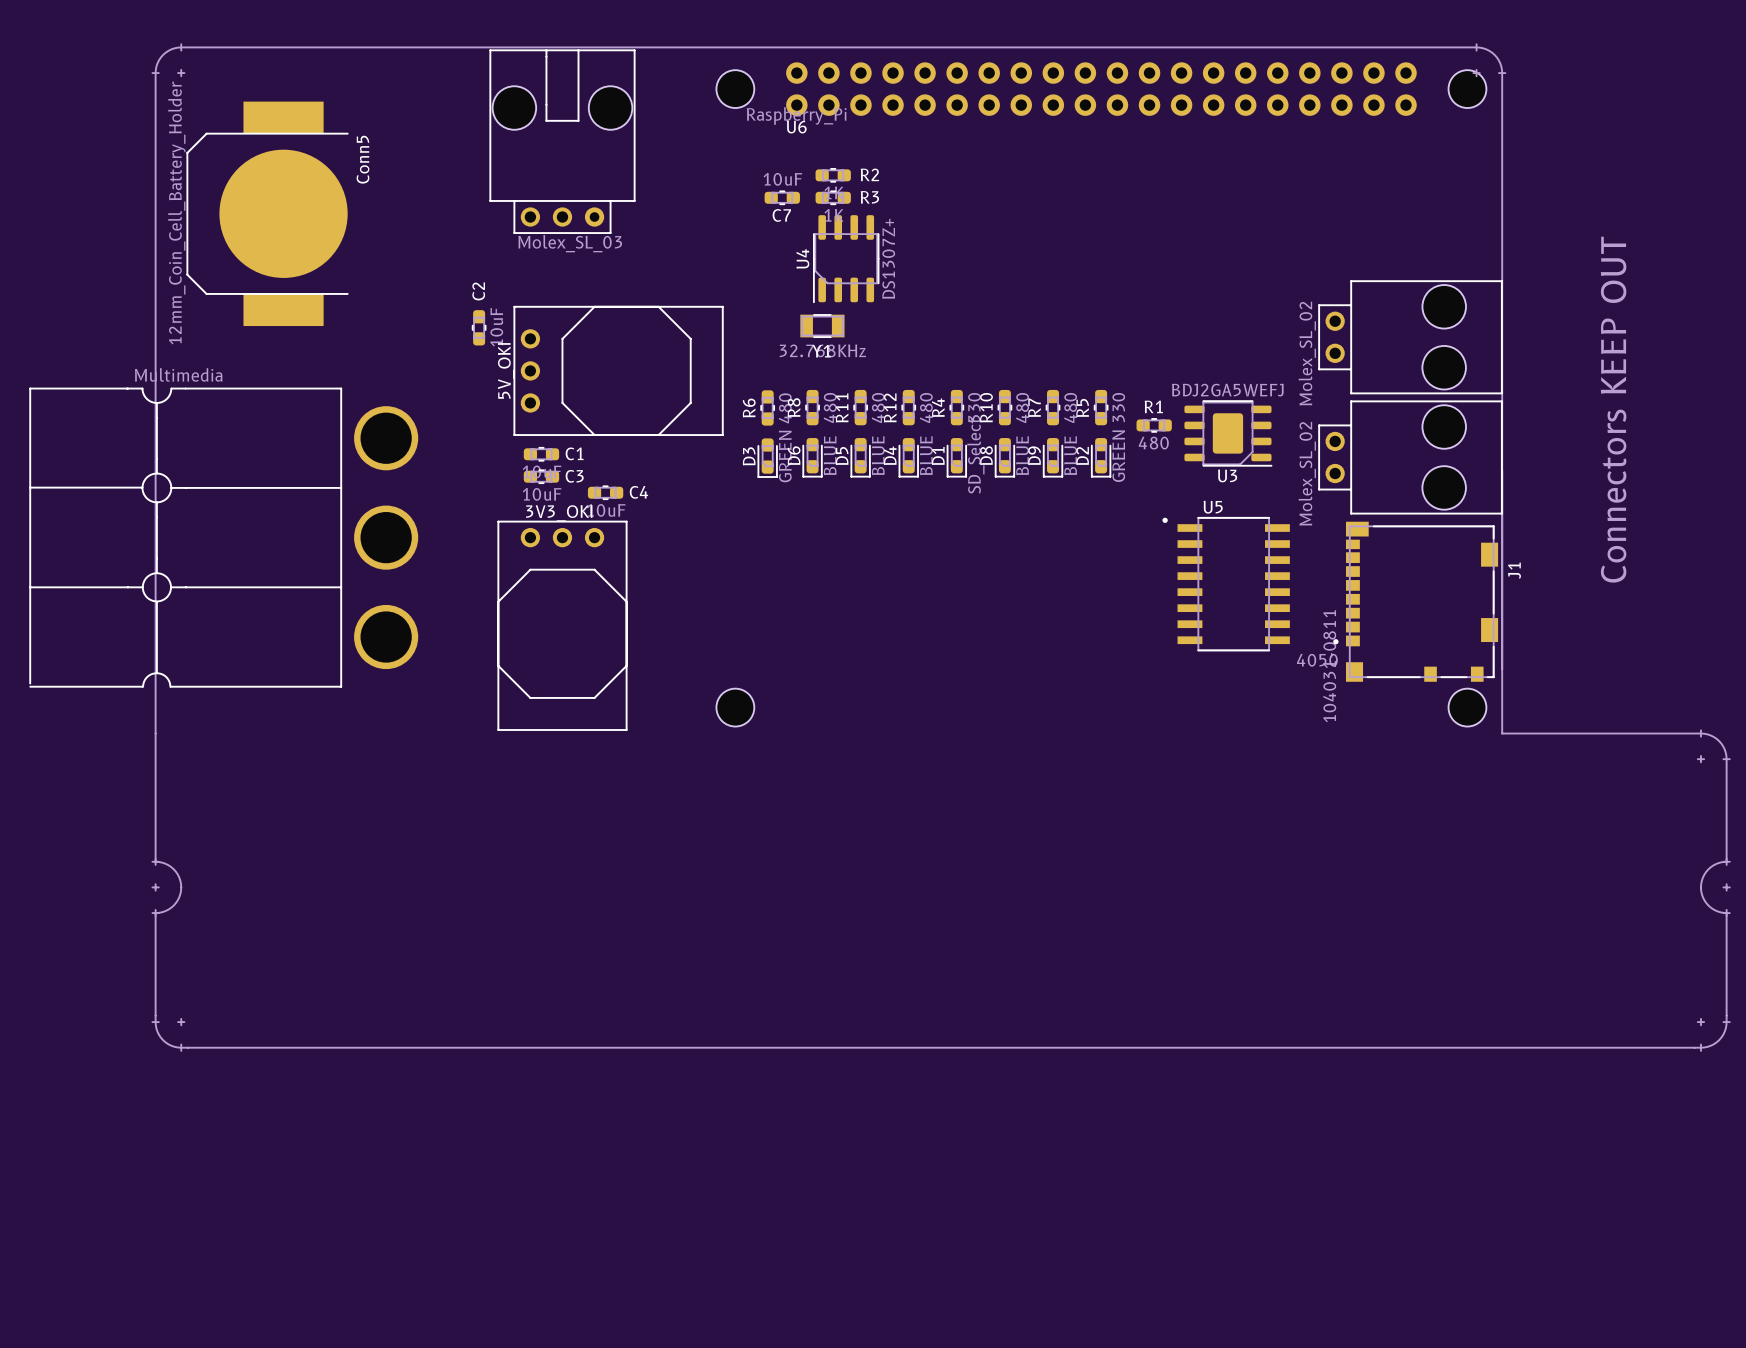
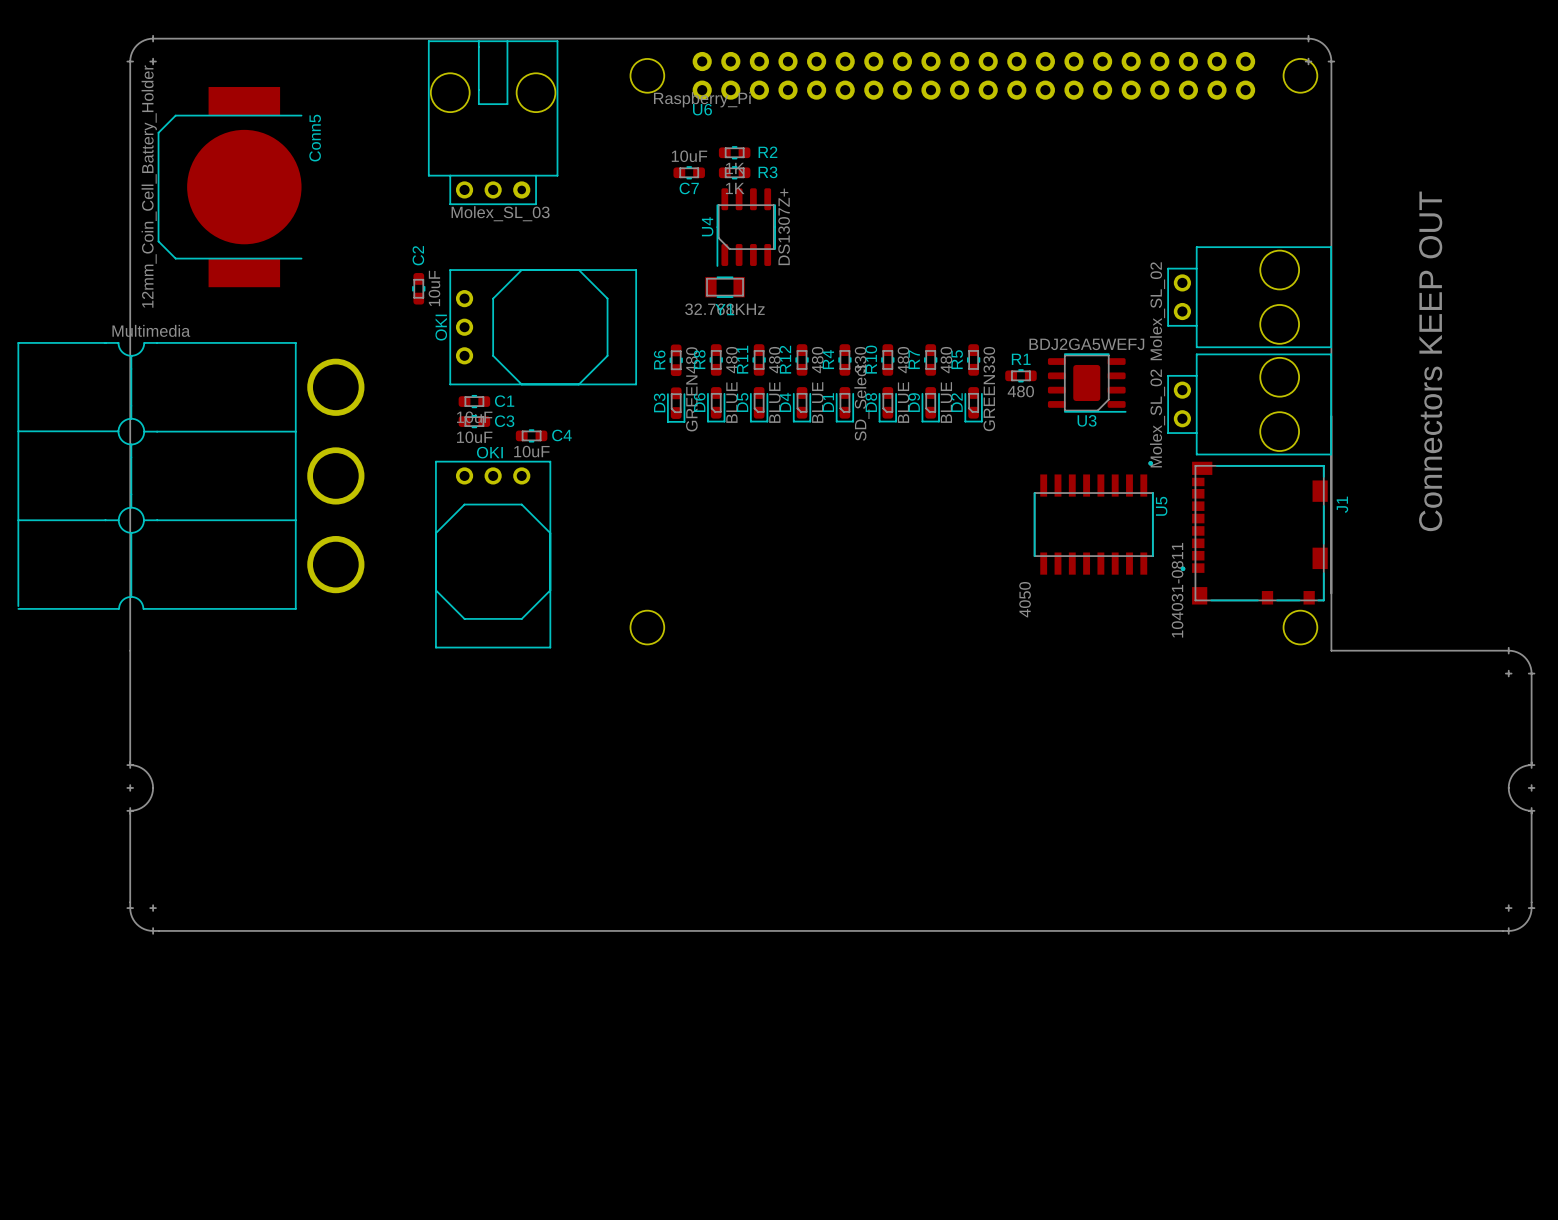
part value: 5V_OKI (506, 370) -> OKI (441, 327)
part value: 3V3_OKI (559, 513) -> OKI (489, 452)
U5 rotation: 0° (1226, 584) -> 90° clockwise (1093, 517)

